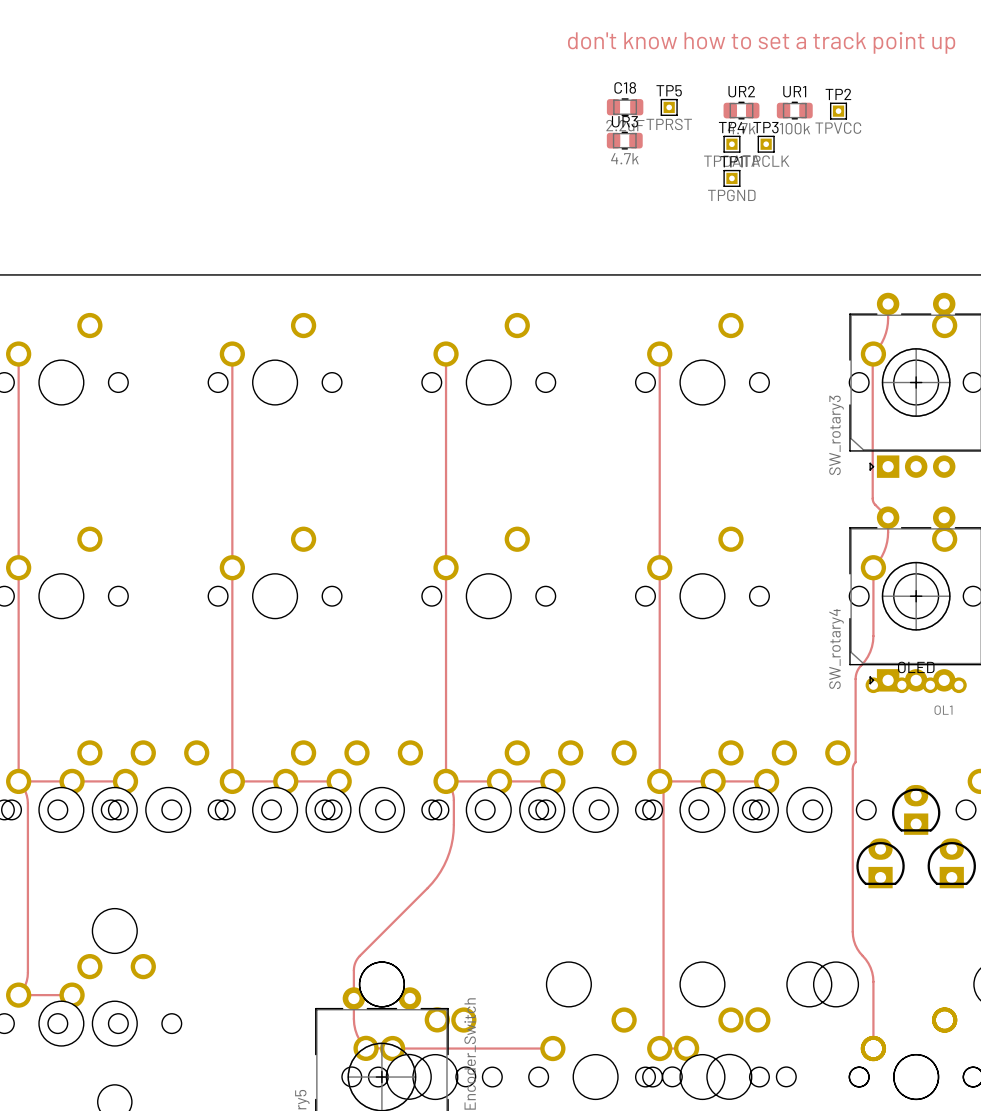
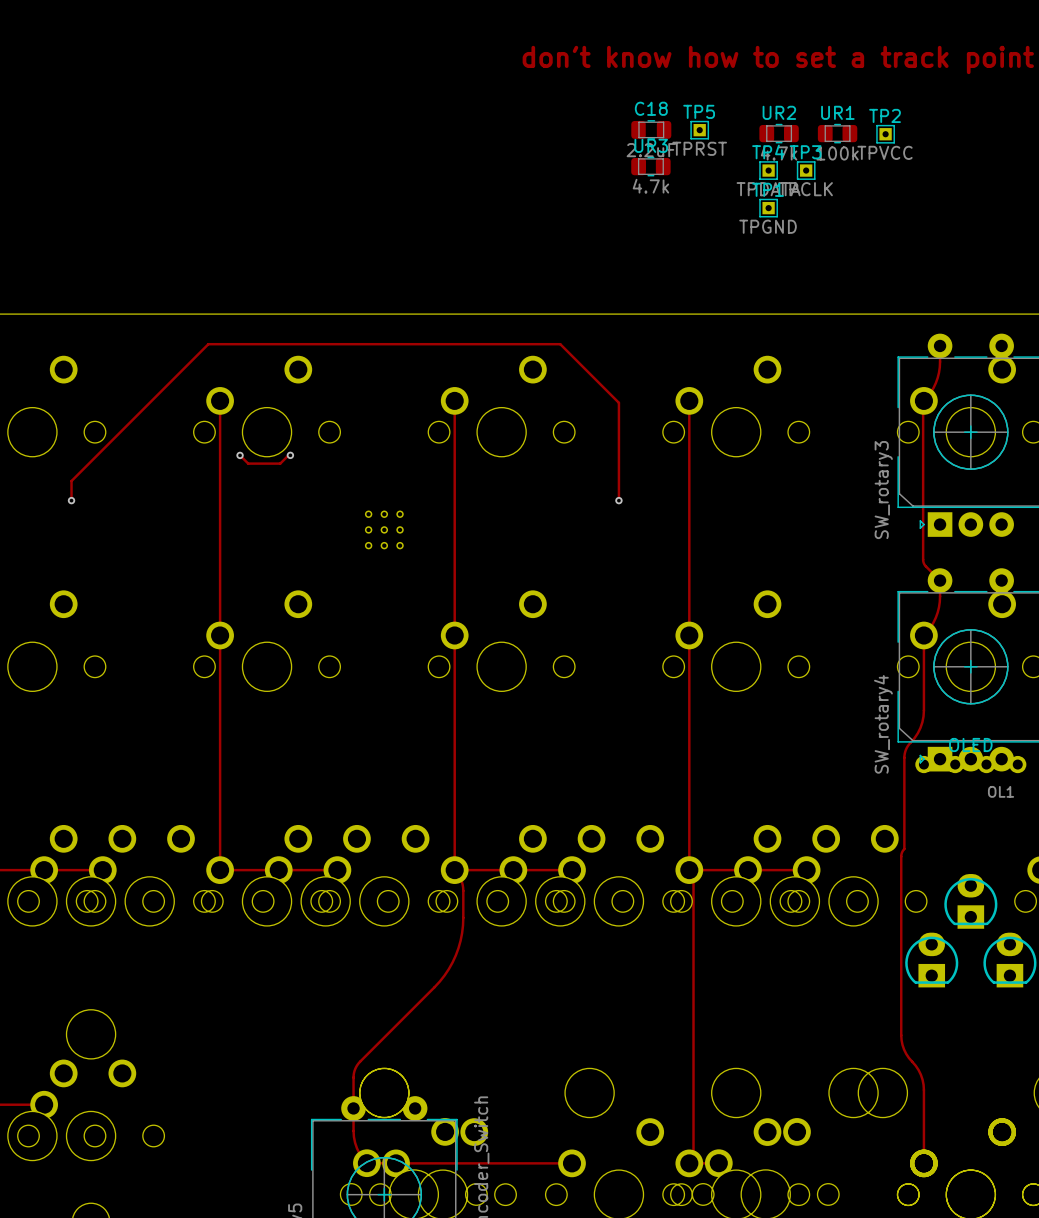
via: none -> (240, 455)
track: none -> (290, 455) (280, 463) (248, 463) (240, 455)
via: none -> (290, 455)
track: none -> (71, 500) (71, 481) (208, 344) (560, 344) (618, 402) (618, 500)
via: none -> (71, 500)
via: none -> (618, 500)
part: none -> (384, 529)

